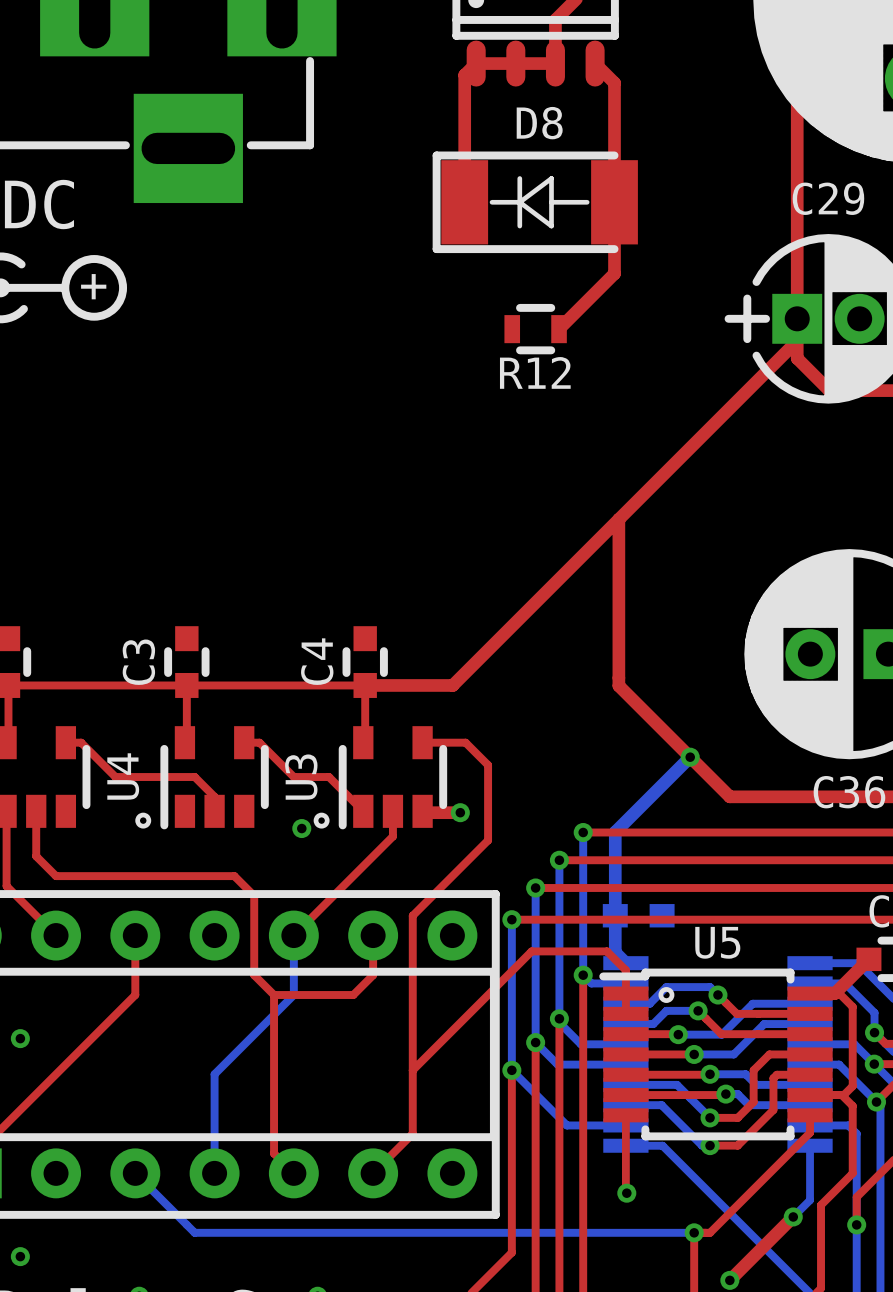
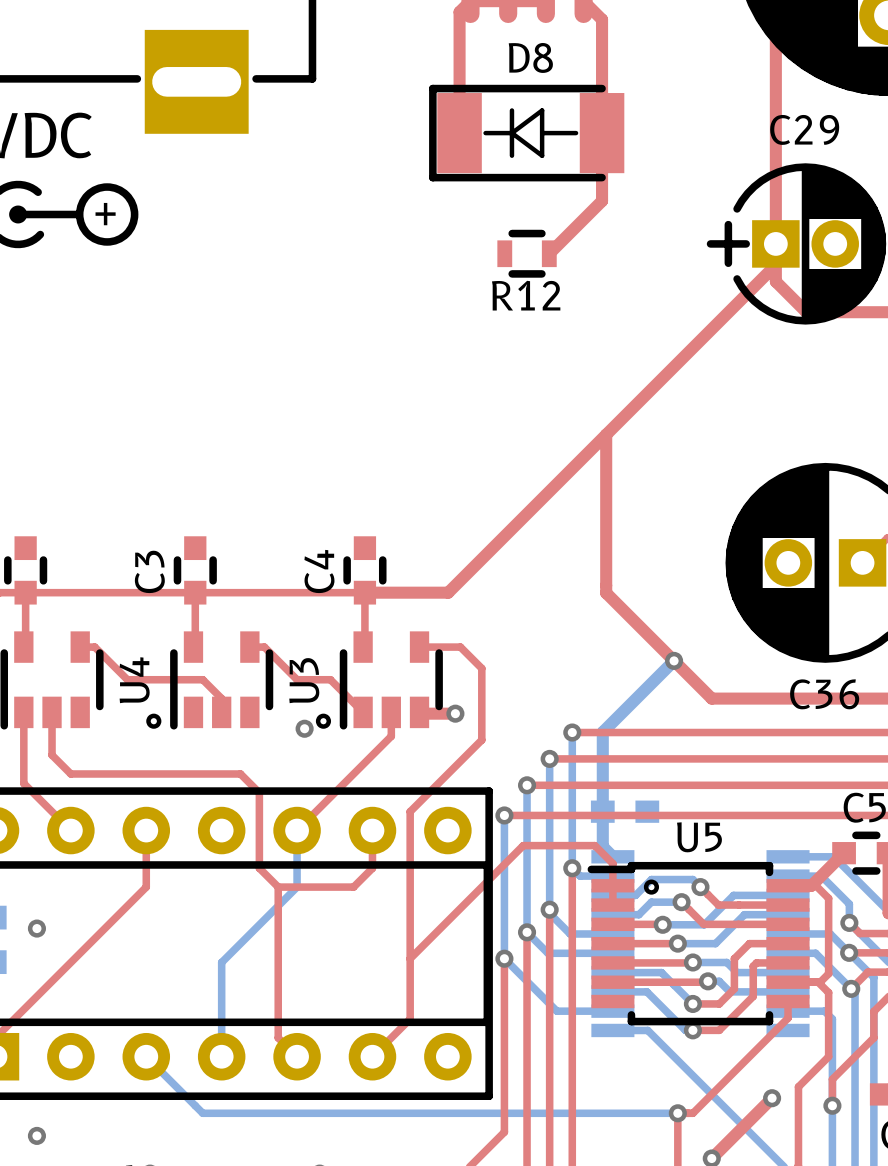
top track: (625, 1115) (626, 1193) -> none
bottom track: (810, 1145) (810, 1200) (793, 1216) -> none
via: (626, 1193) -> none

